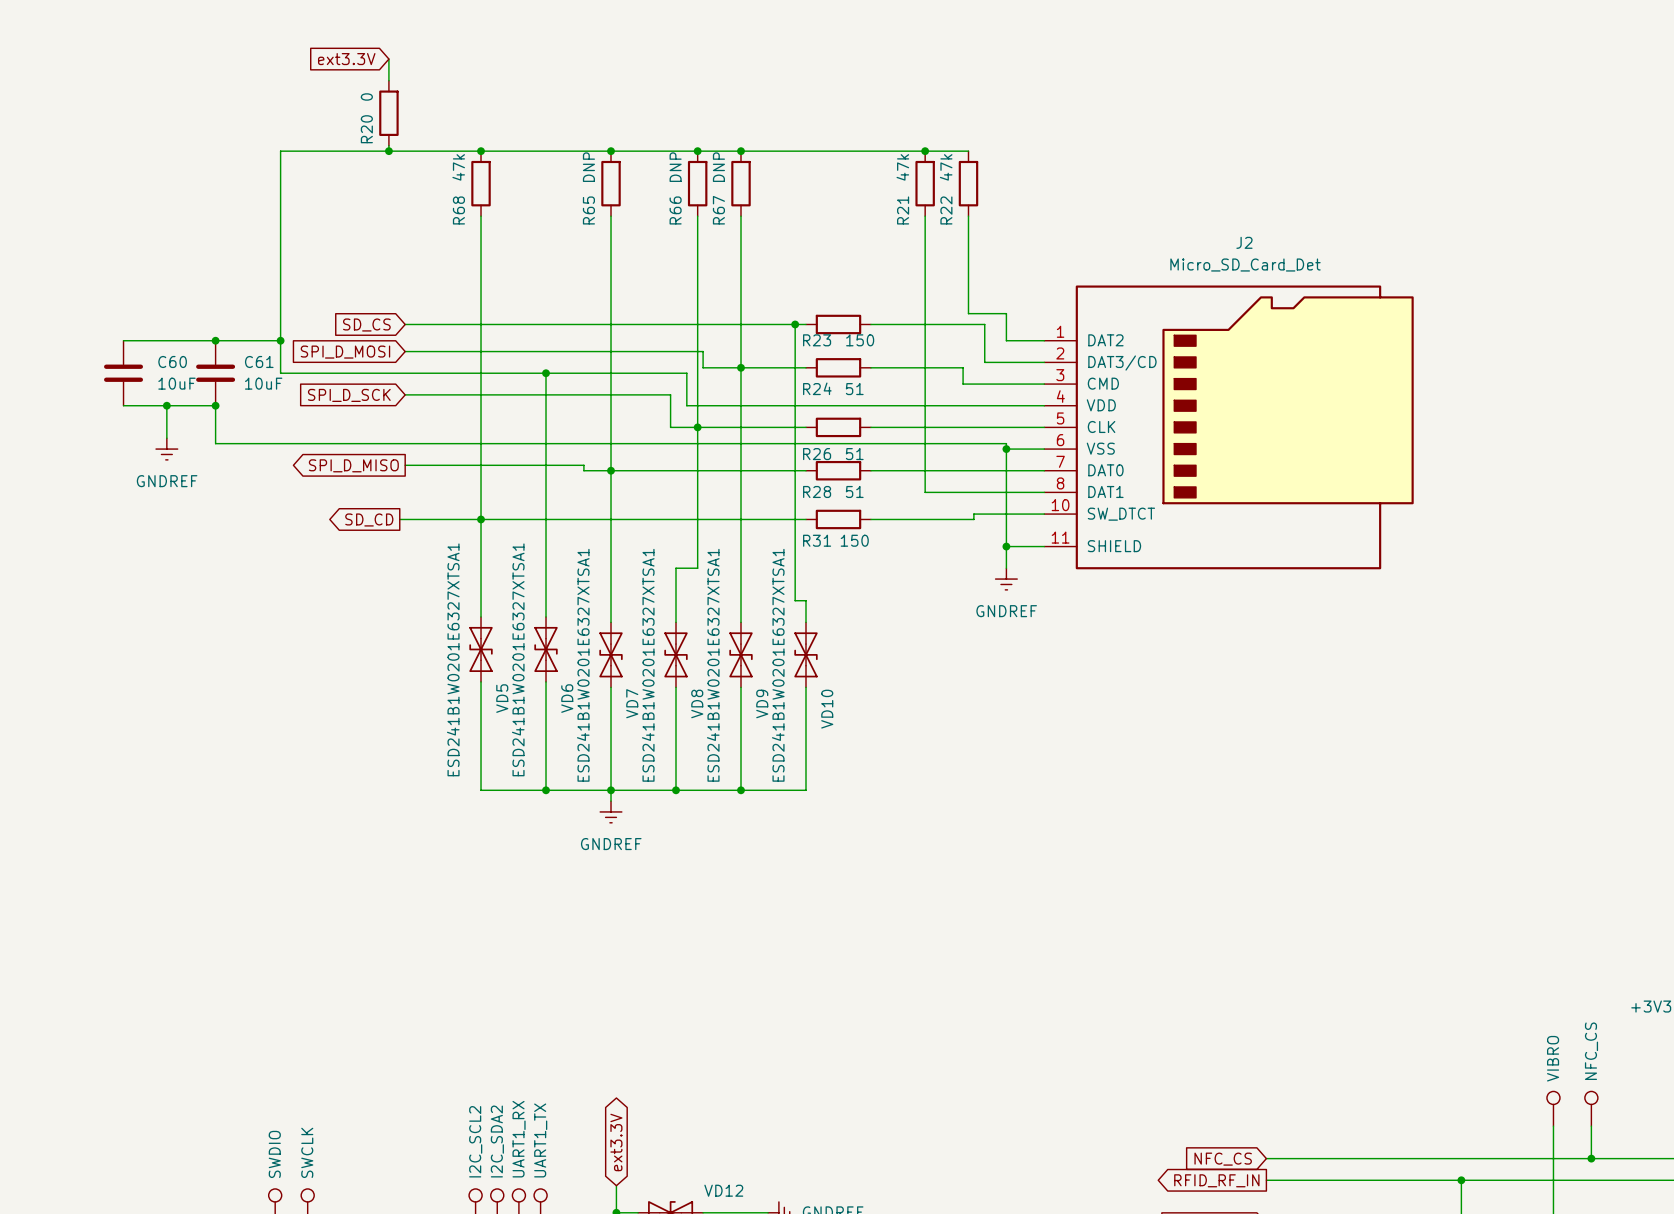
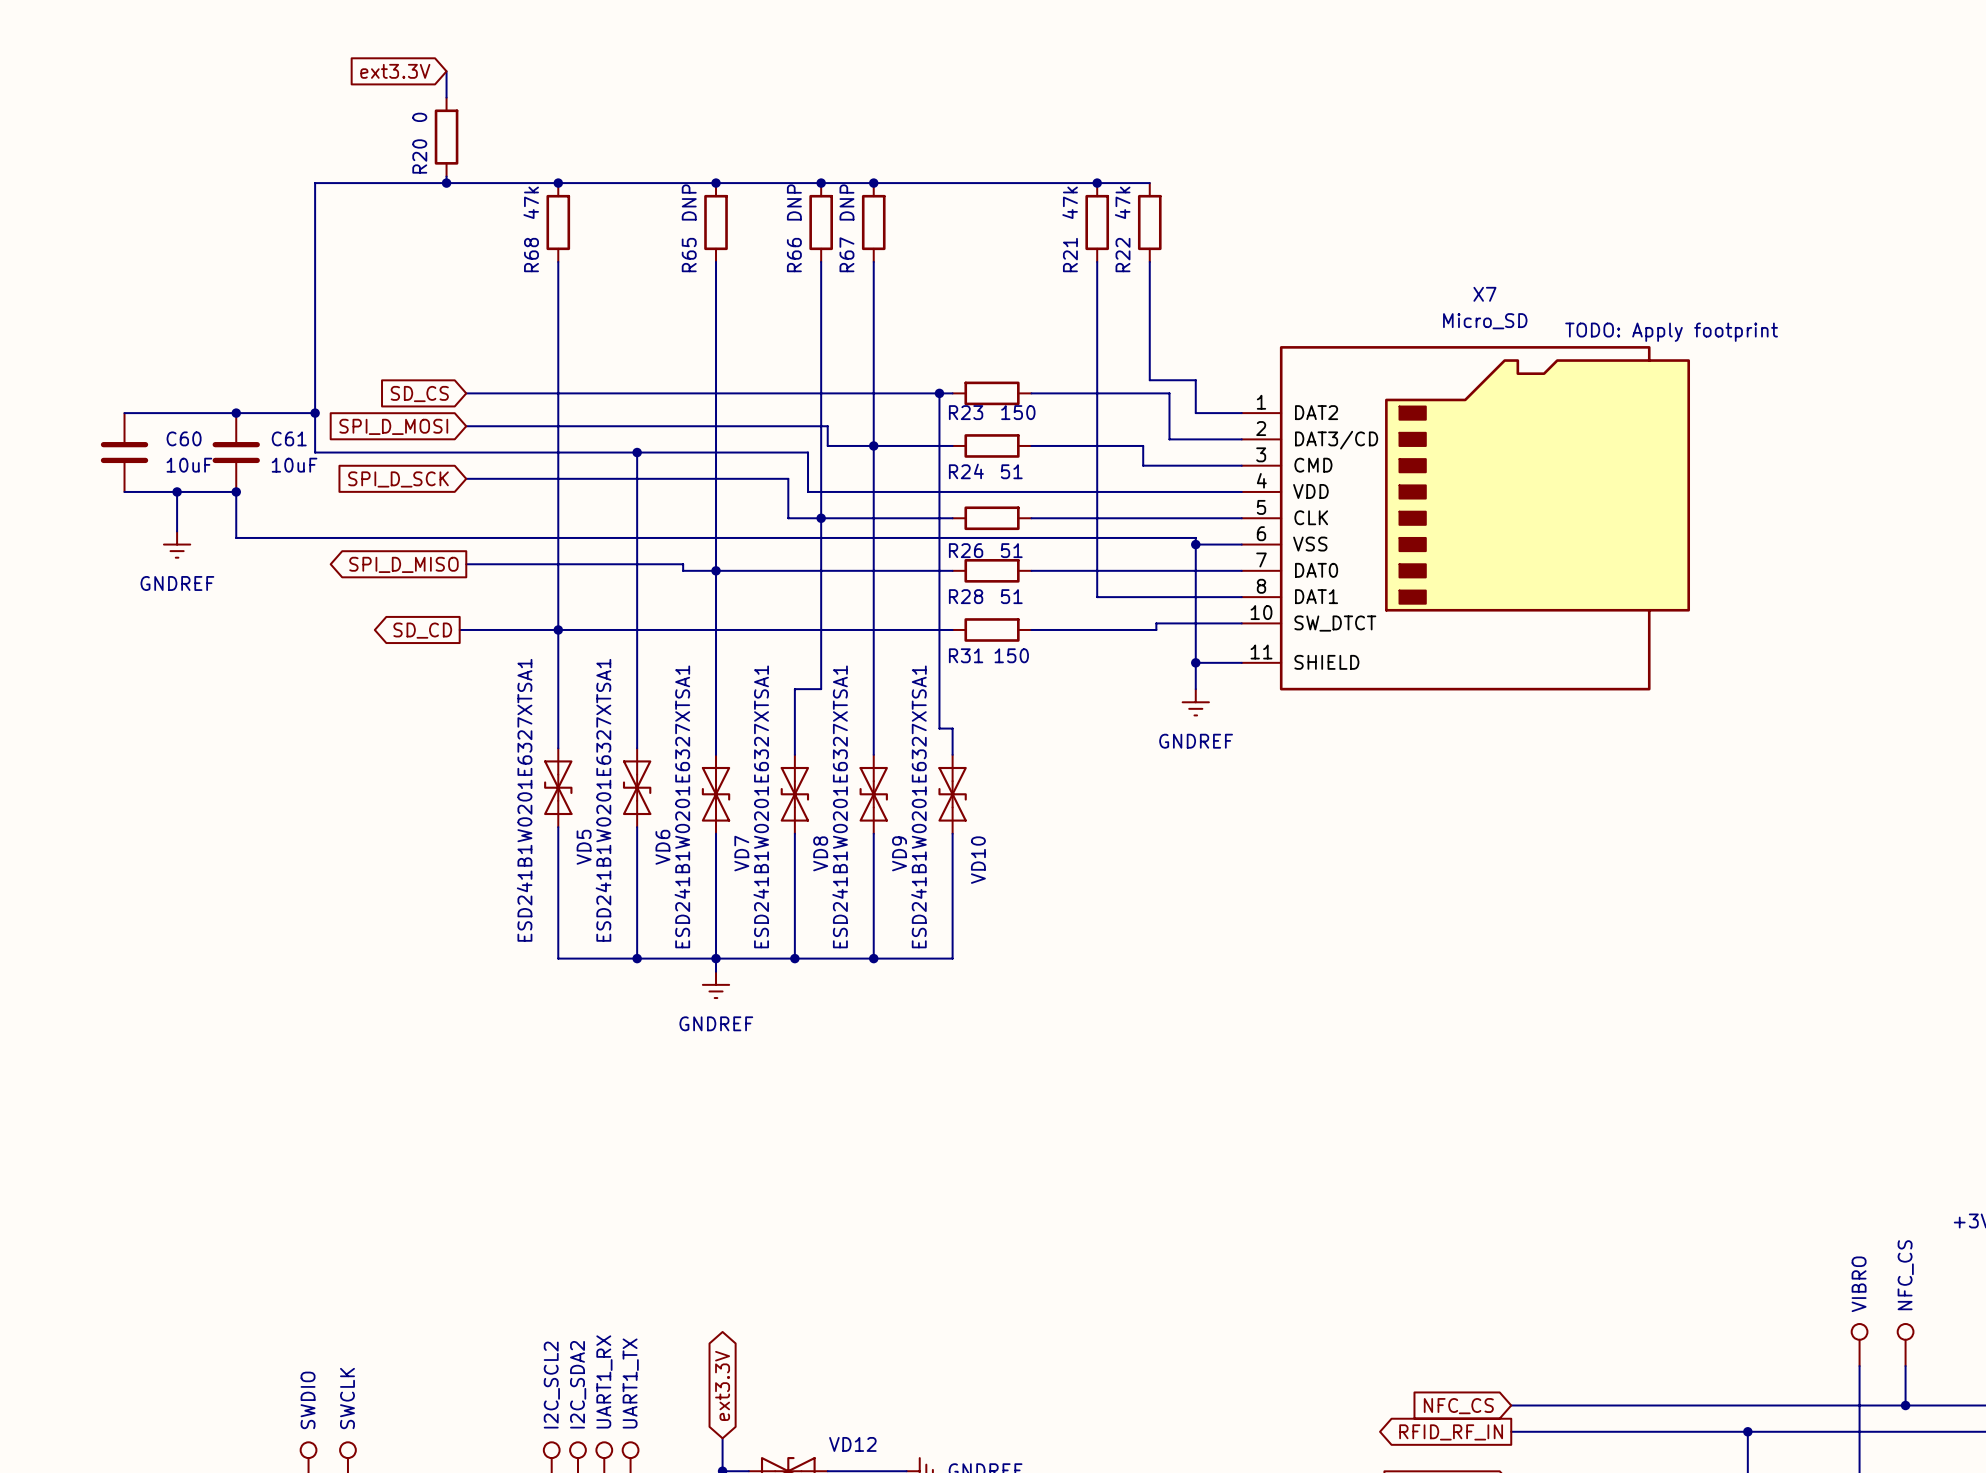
J2 name: J2 (1244, 242) -> X7 (1484, 294)
J2 value: Micro_SD_Card_Det (1245, 265) -> Micro_SD (1485, 321)
text: none -> TODO: Apply footprint (1671, 332)

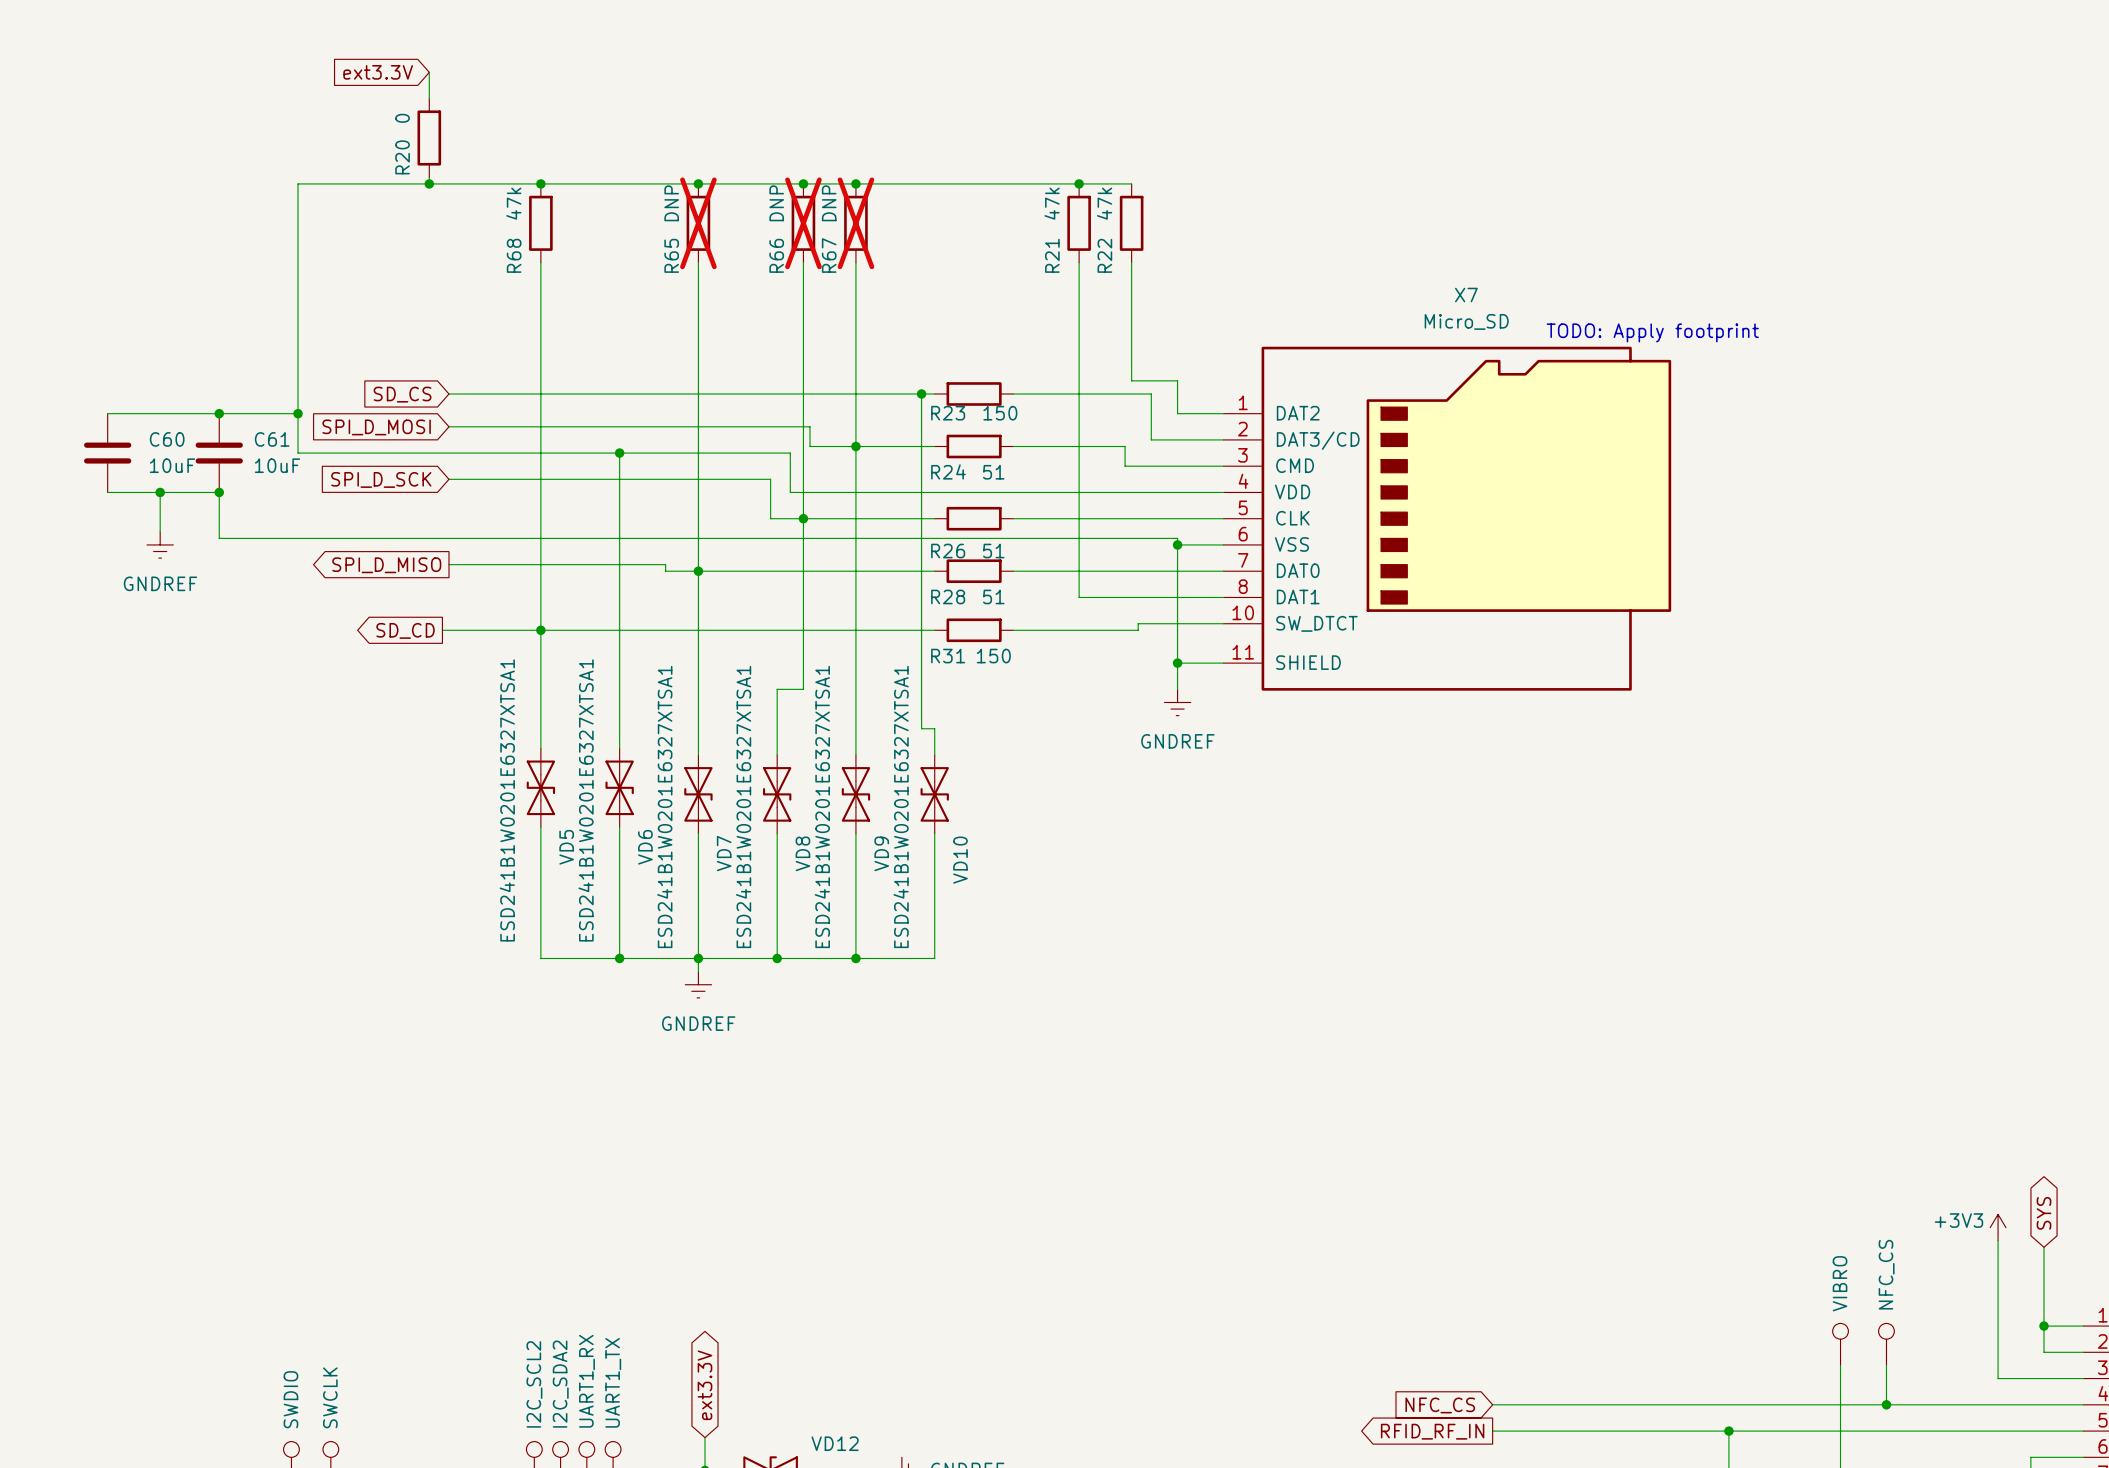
R65 do-not-place cross: none -> (698, 223)
R66 do-not-place cross: none -> (803, 223)
R67 do-not-place cross: none -> (855, 223)

